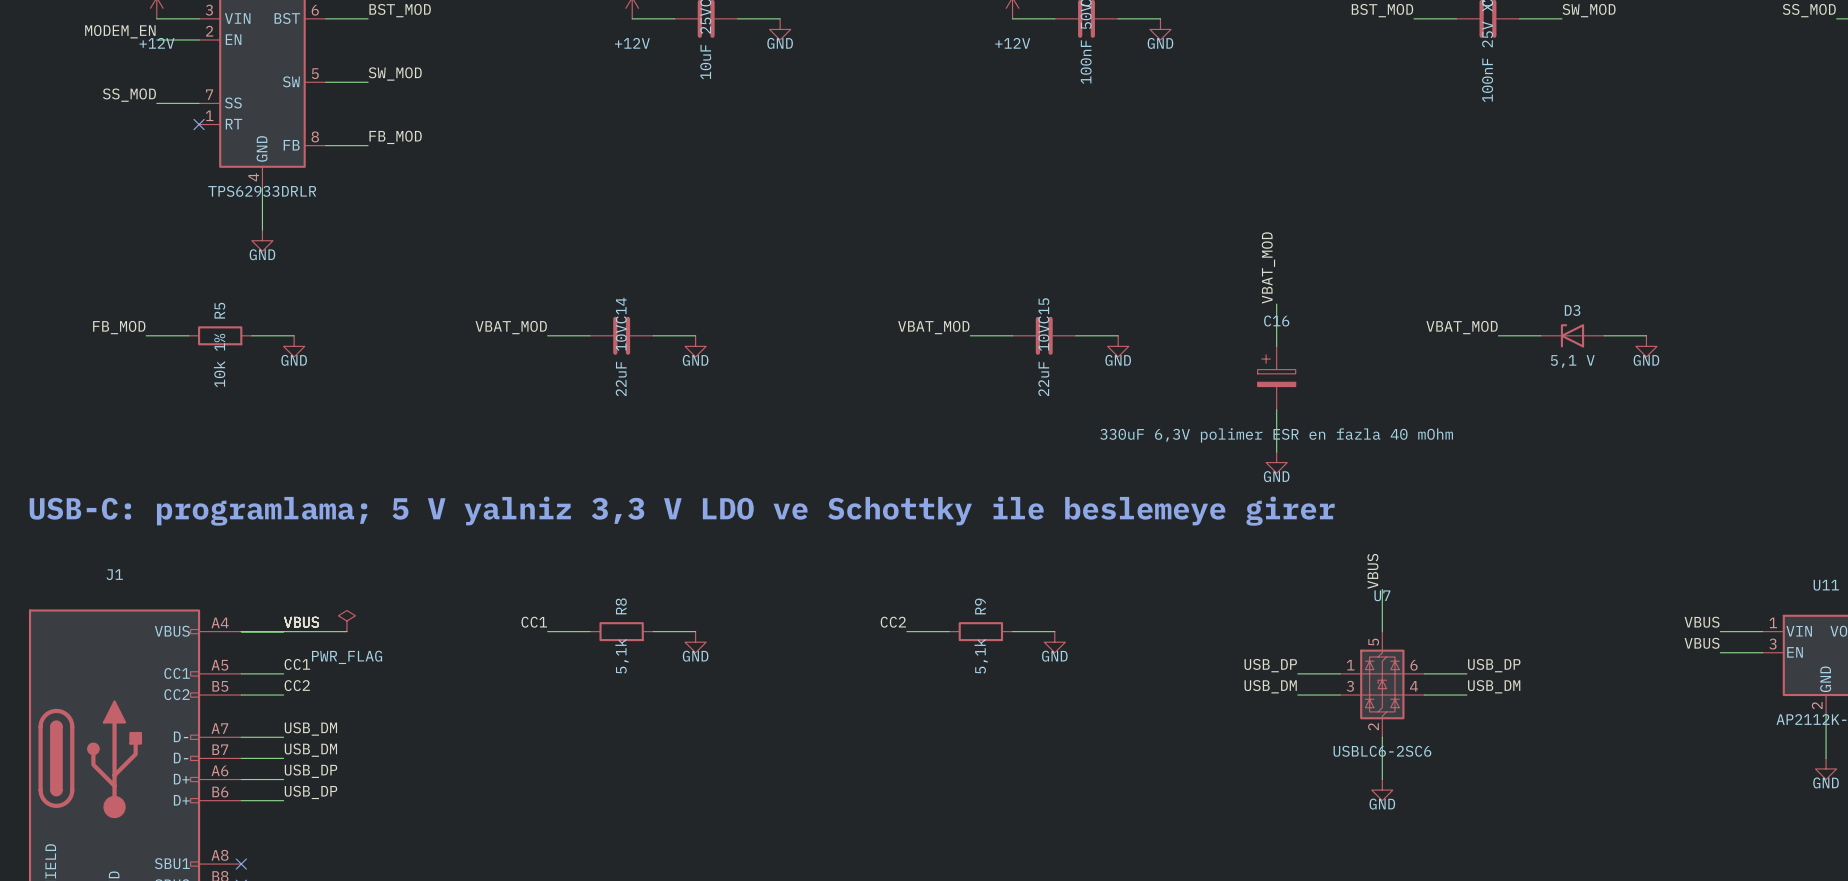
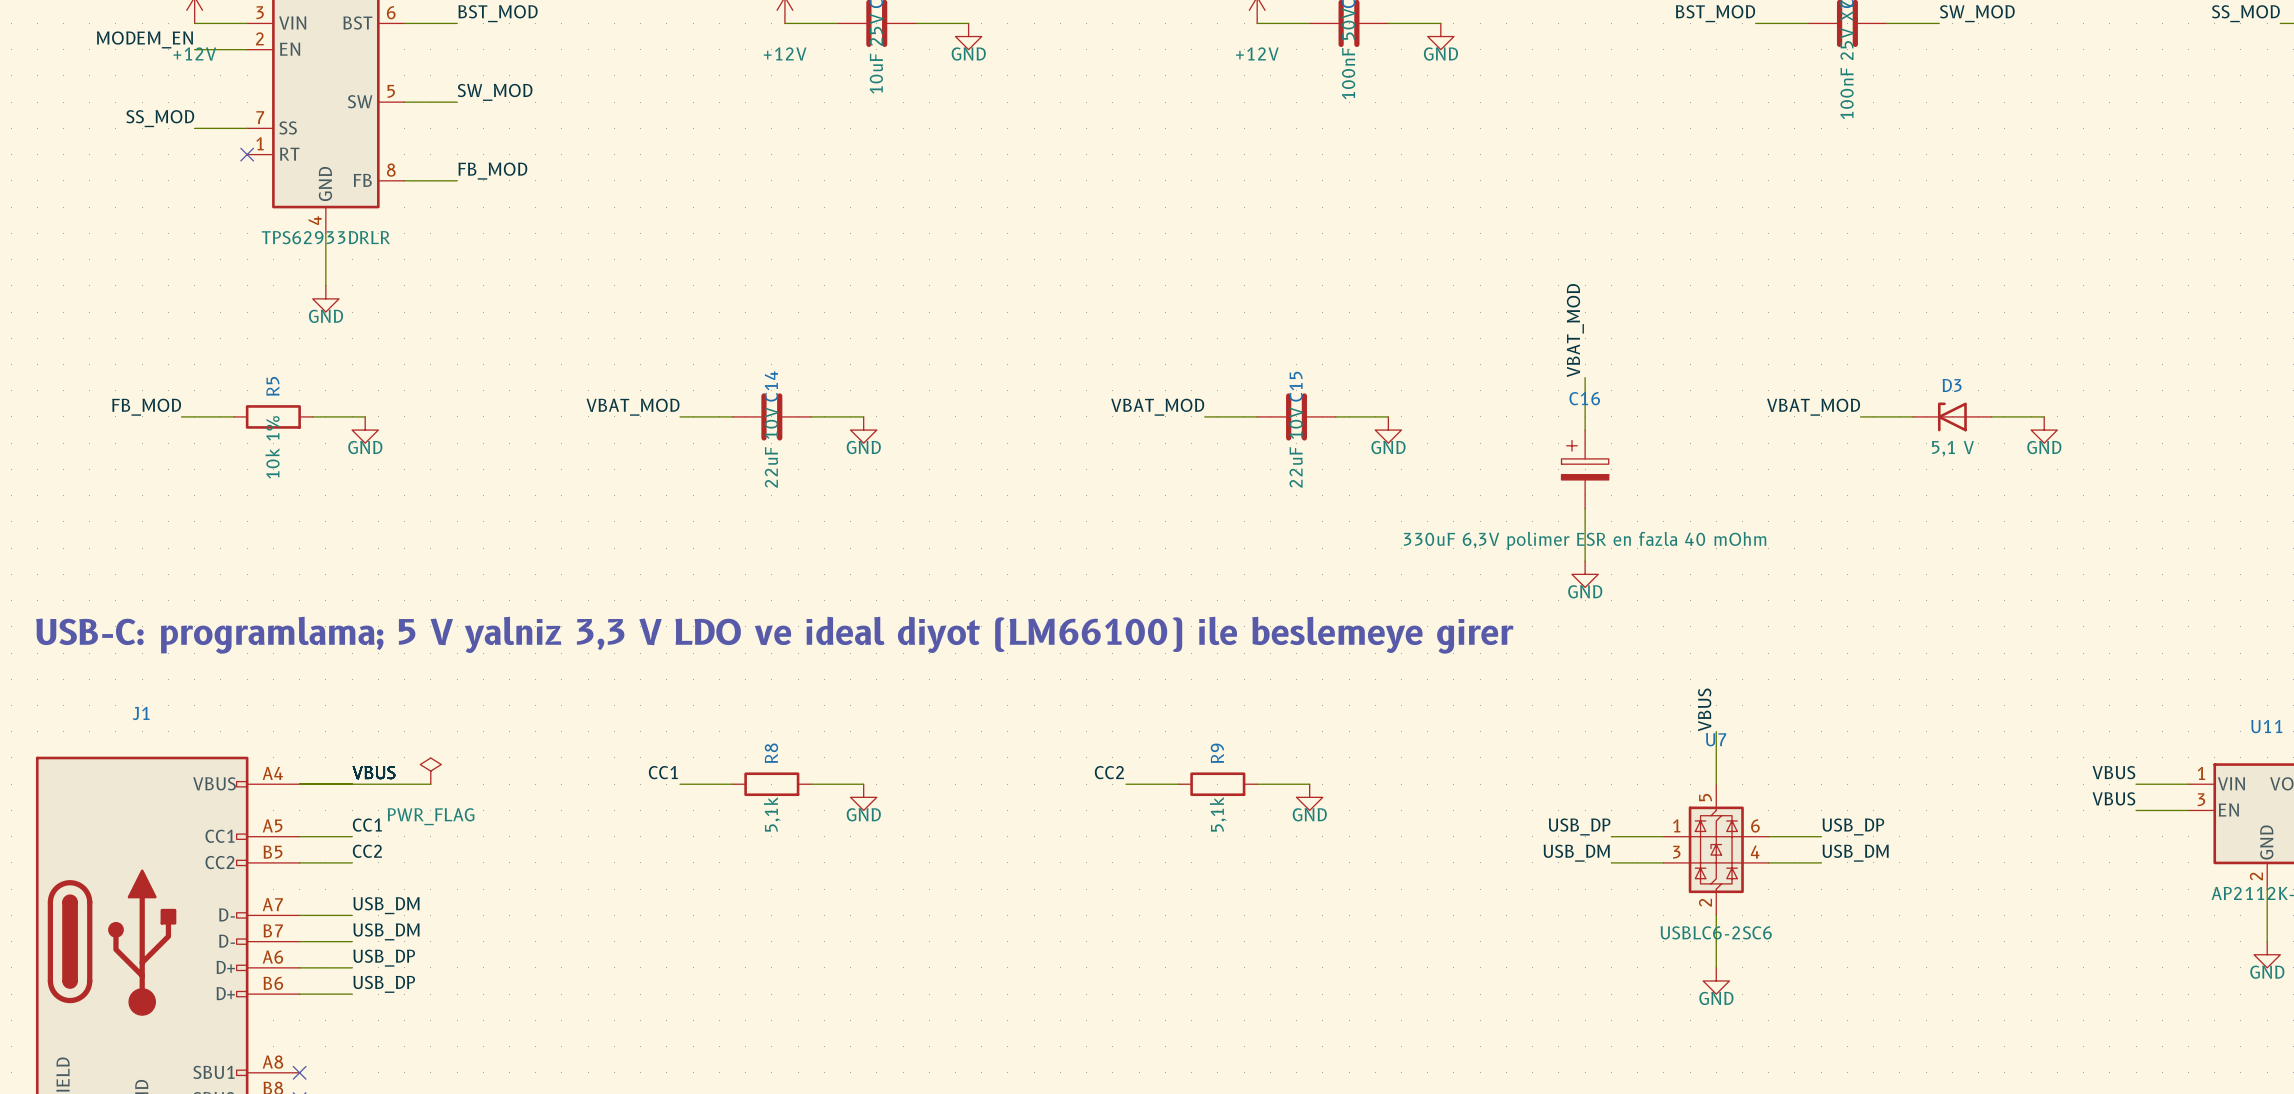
text: USB-C: programlama; 5 V yalniz 3,3 V LDO ve Schottky ile beslemeye girer (682, 511) -> USB-C: programlama; 5 V yalniz 3,3 V LDO ve ideal diyot (LM66100) ile beslemeye girer (774, 635)

